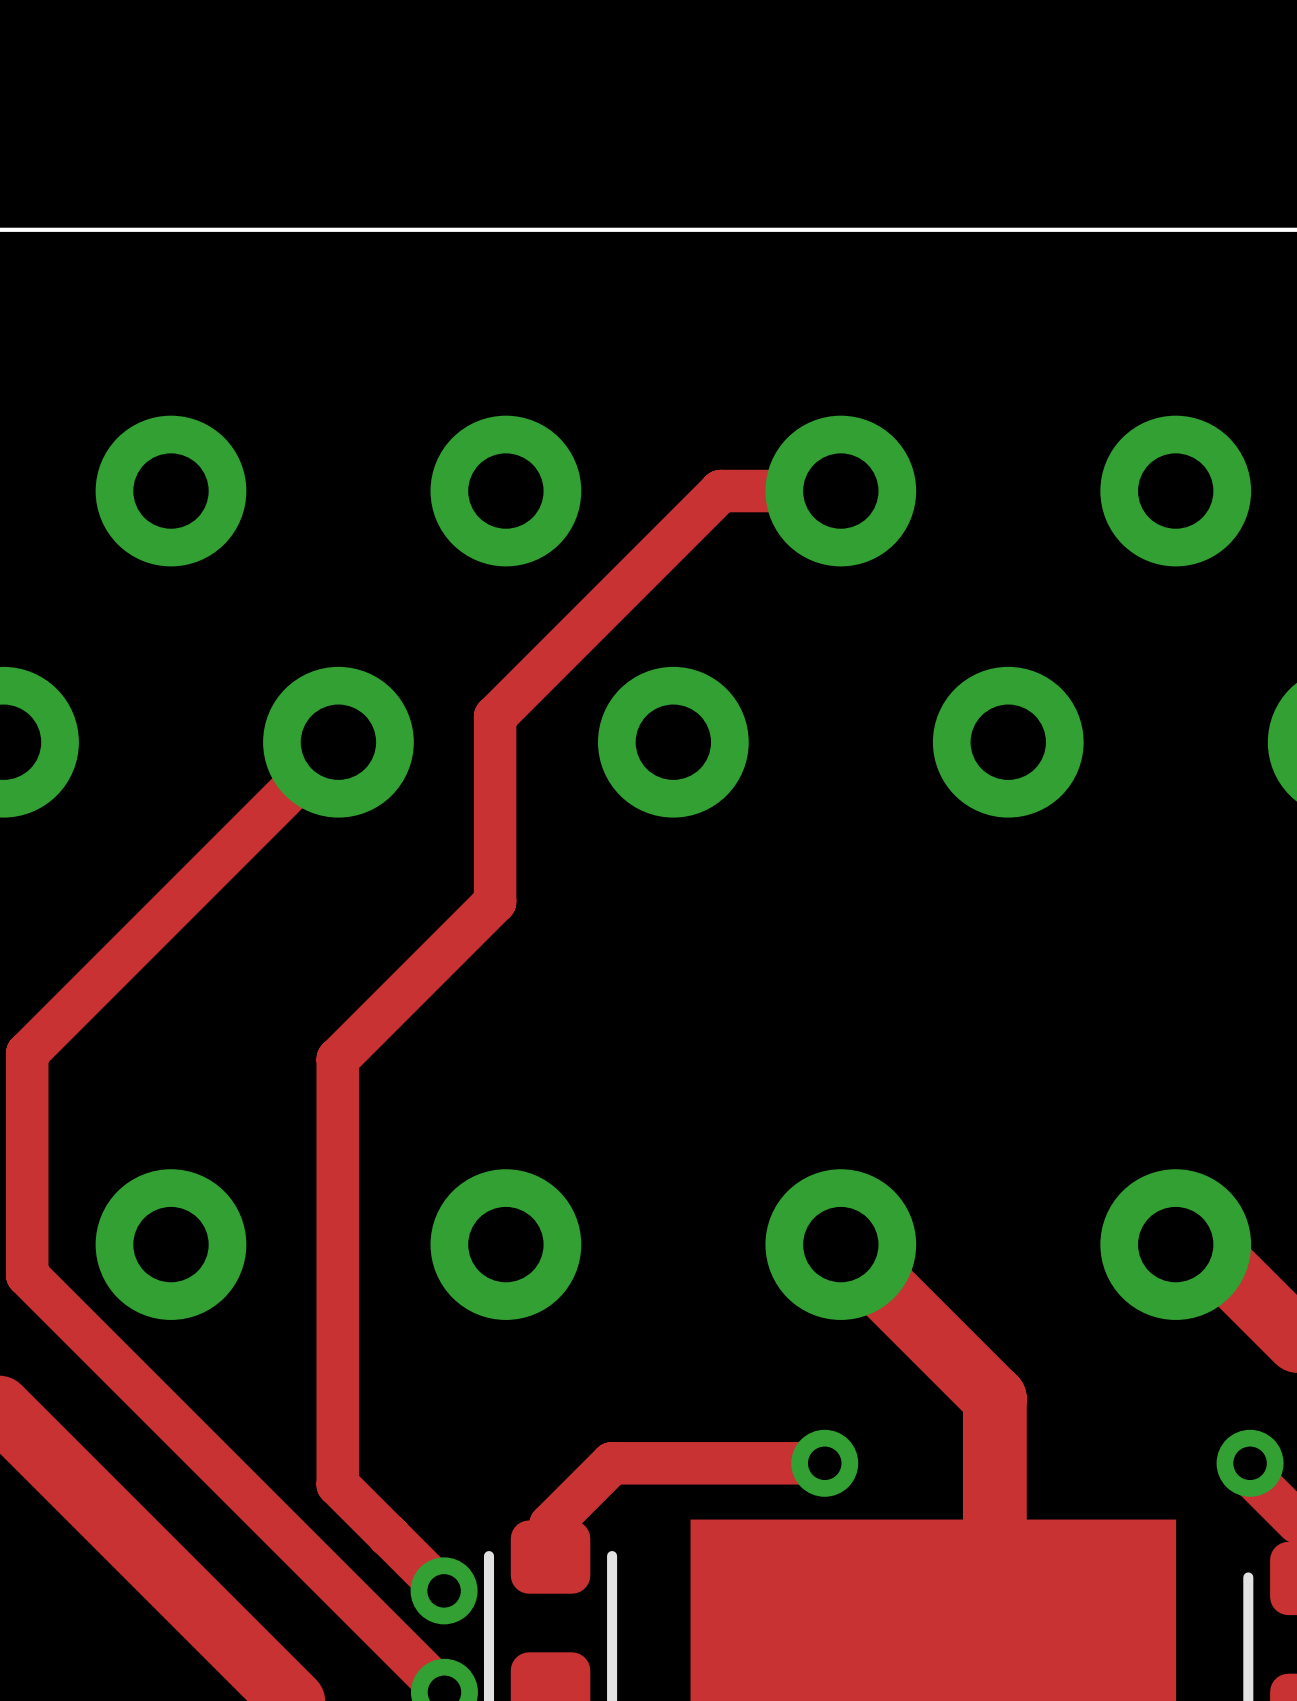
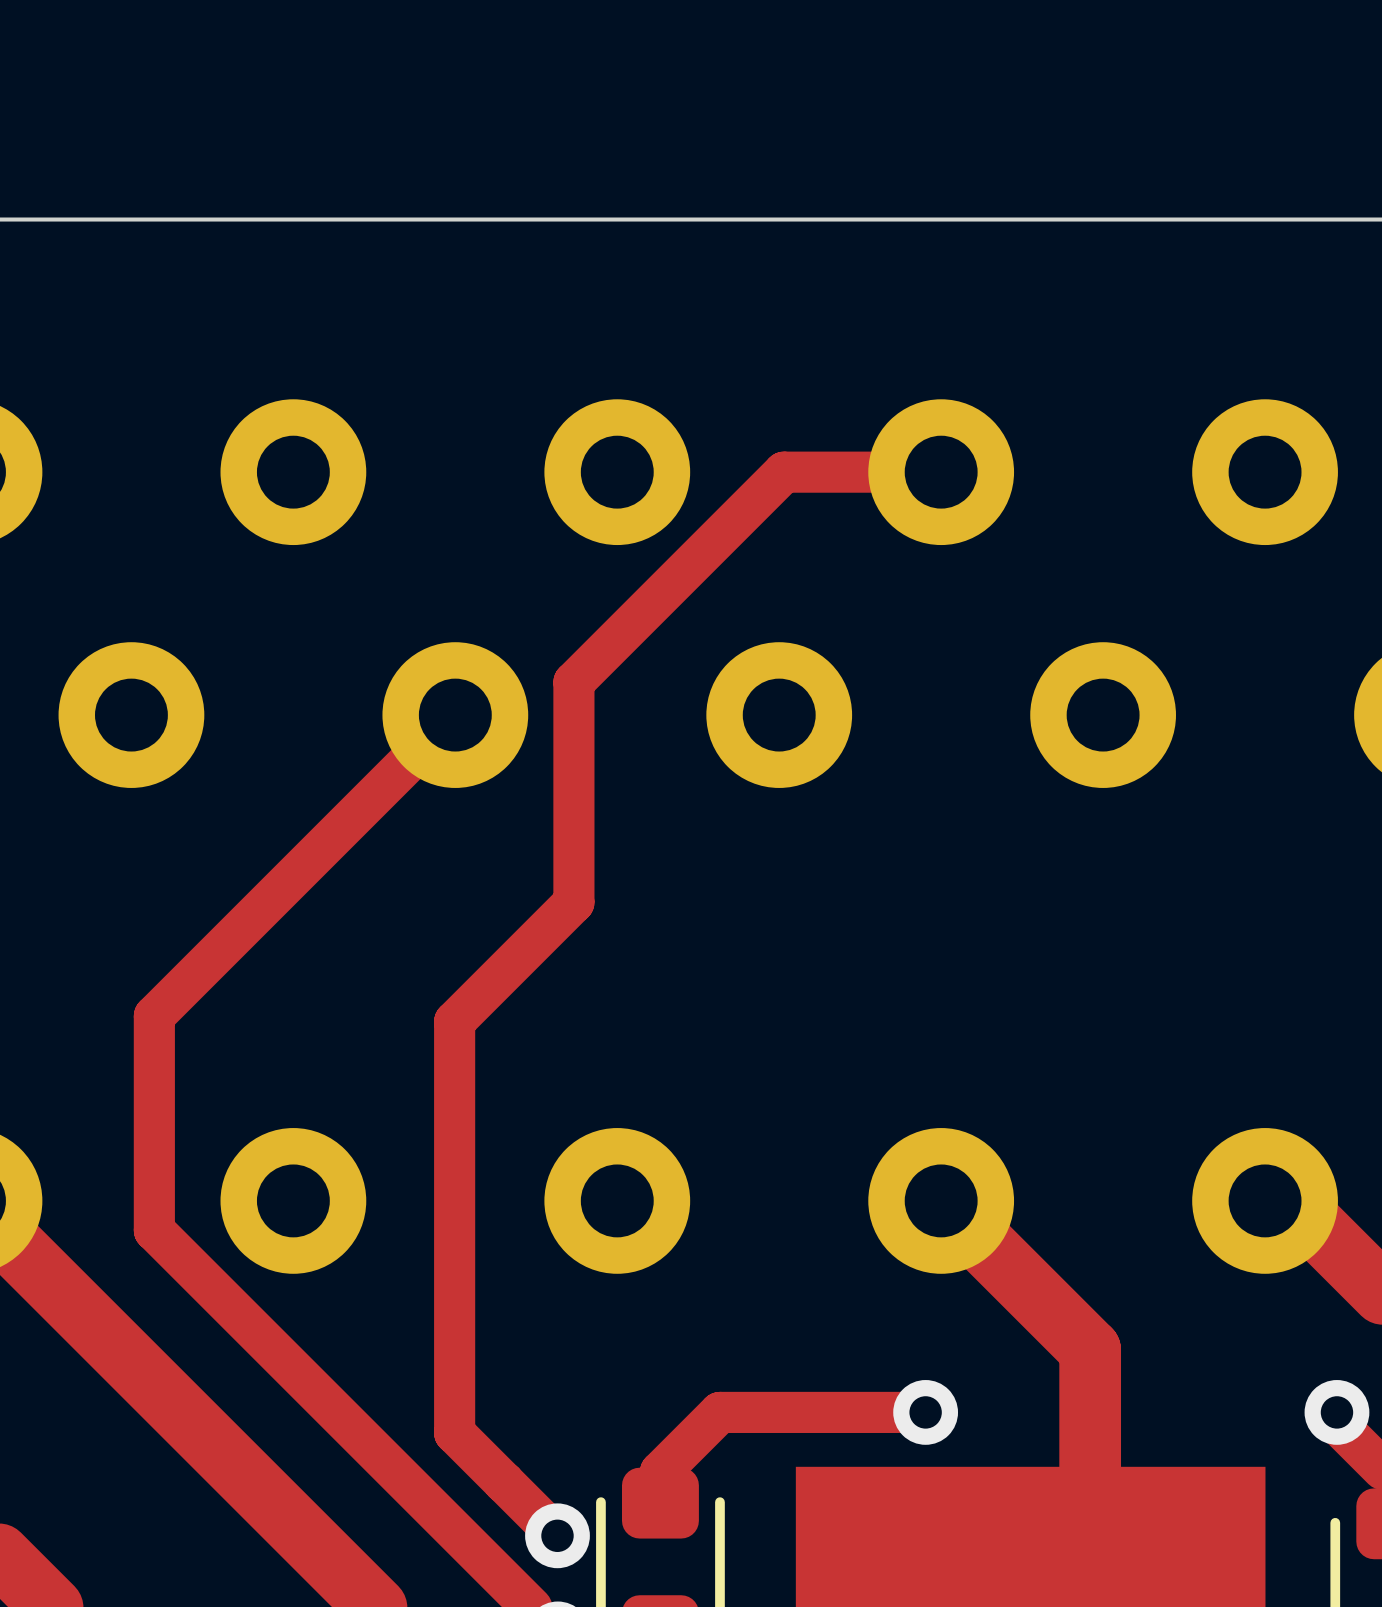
track: (720, 491) (495, 716) (495, 901) (461, 935) -> (825, 472) (784, 472) (573, 682) (573, 902)

